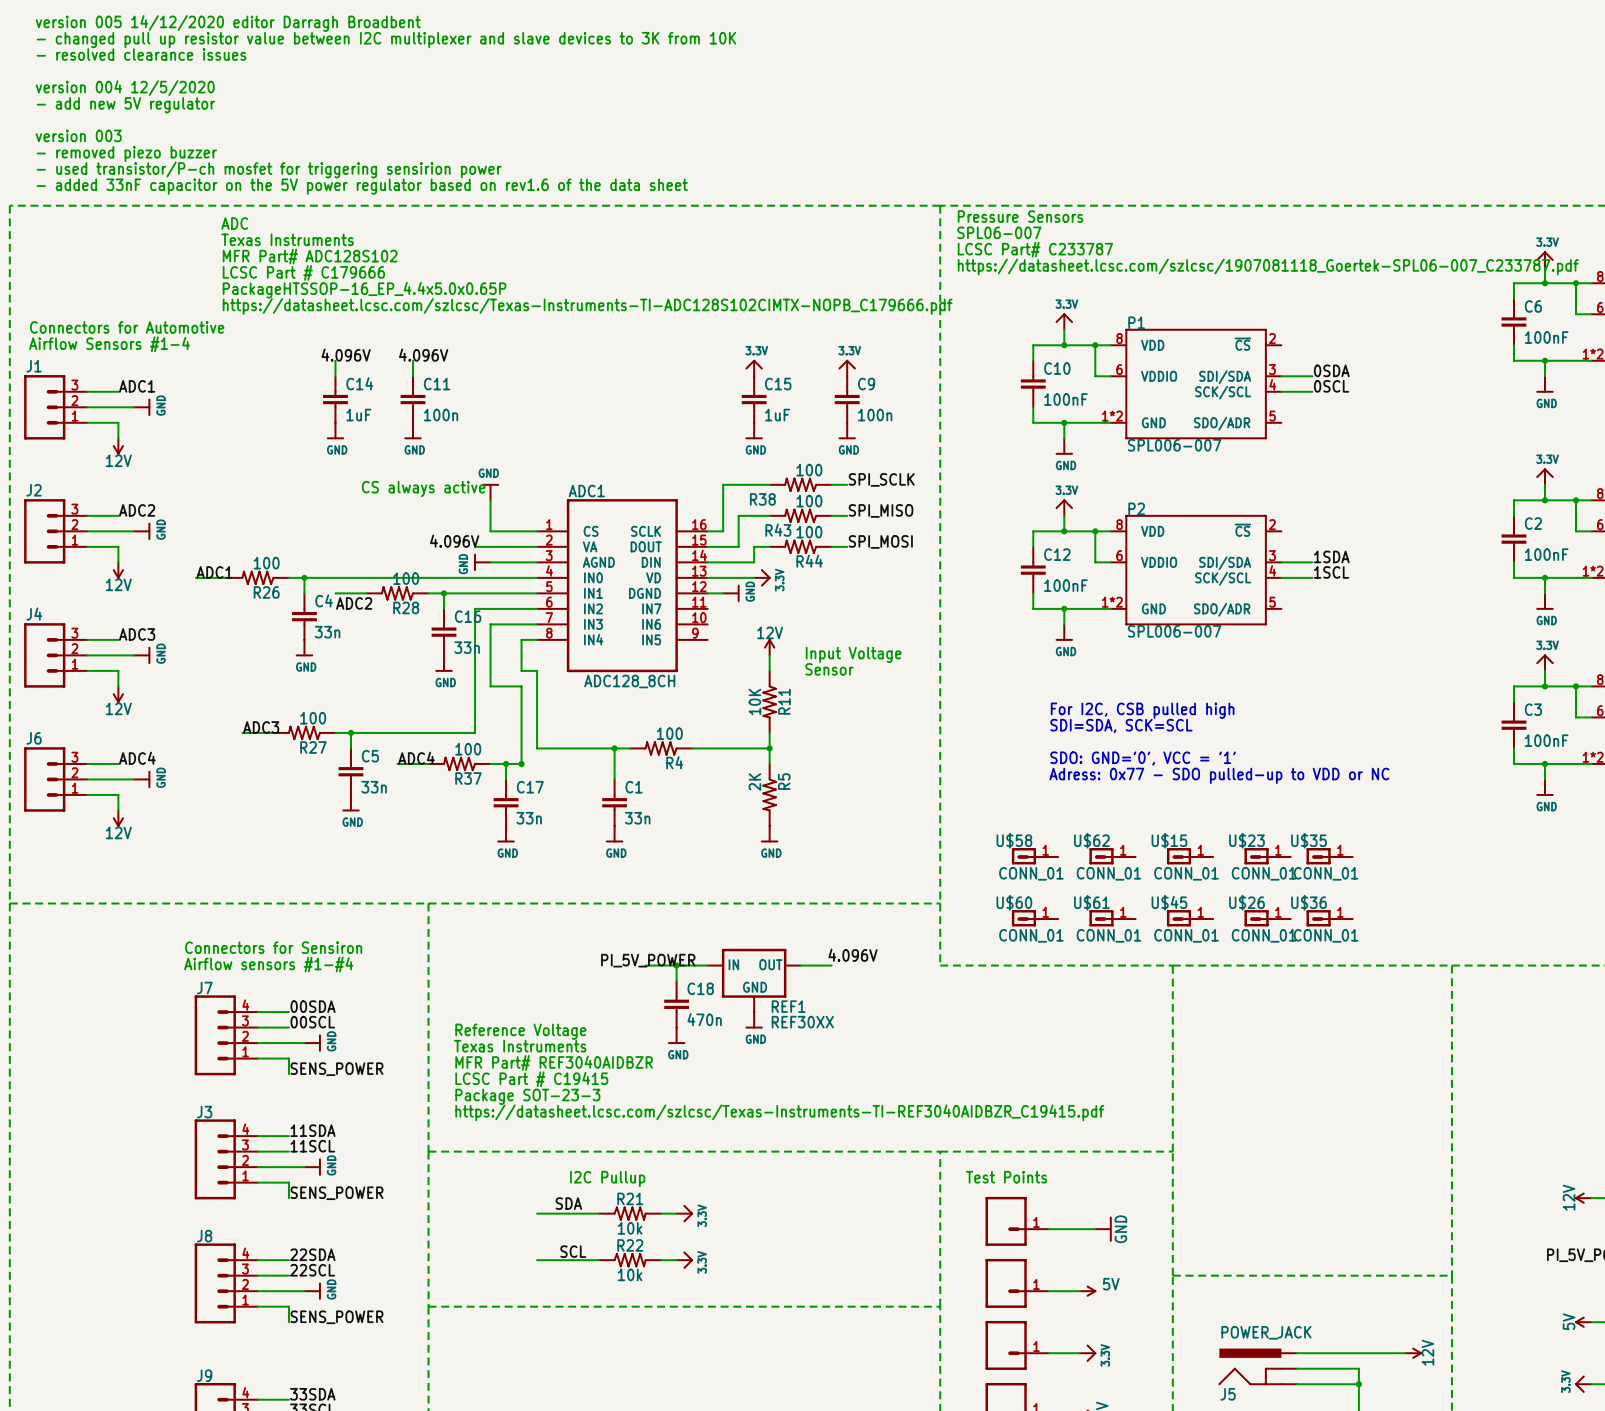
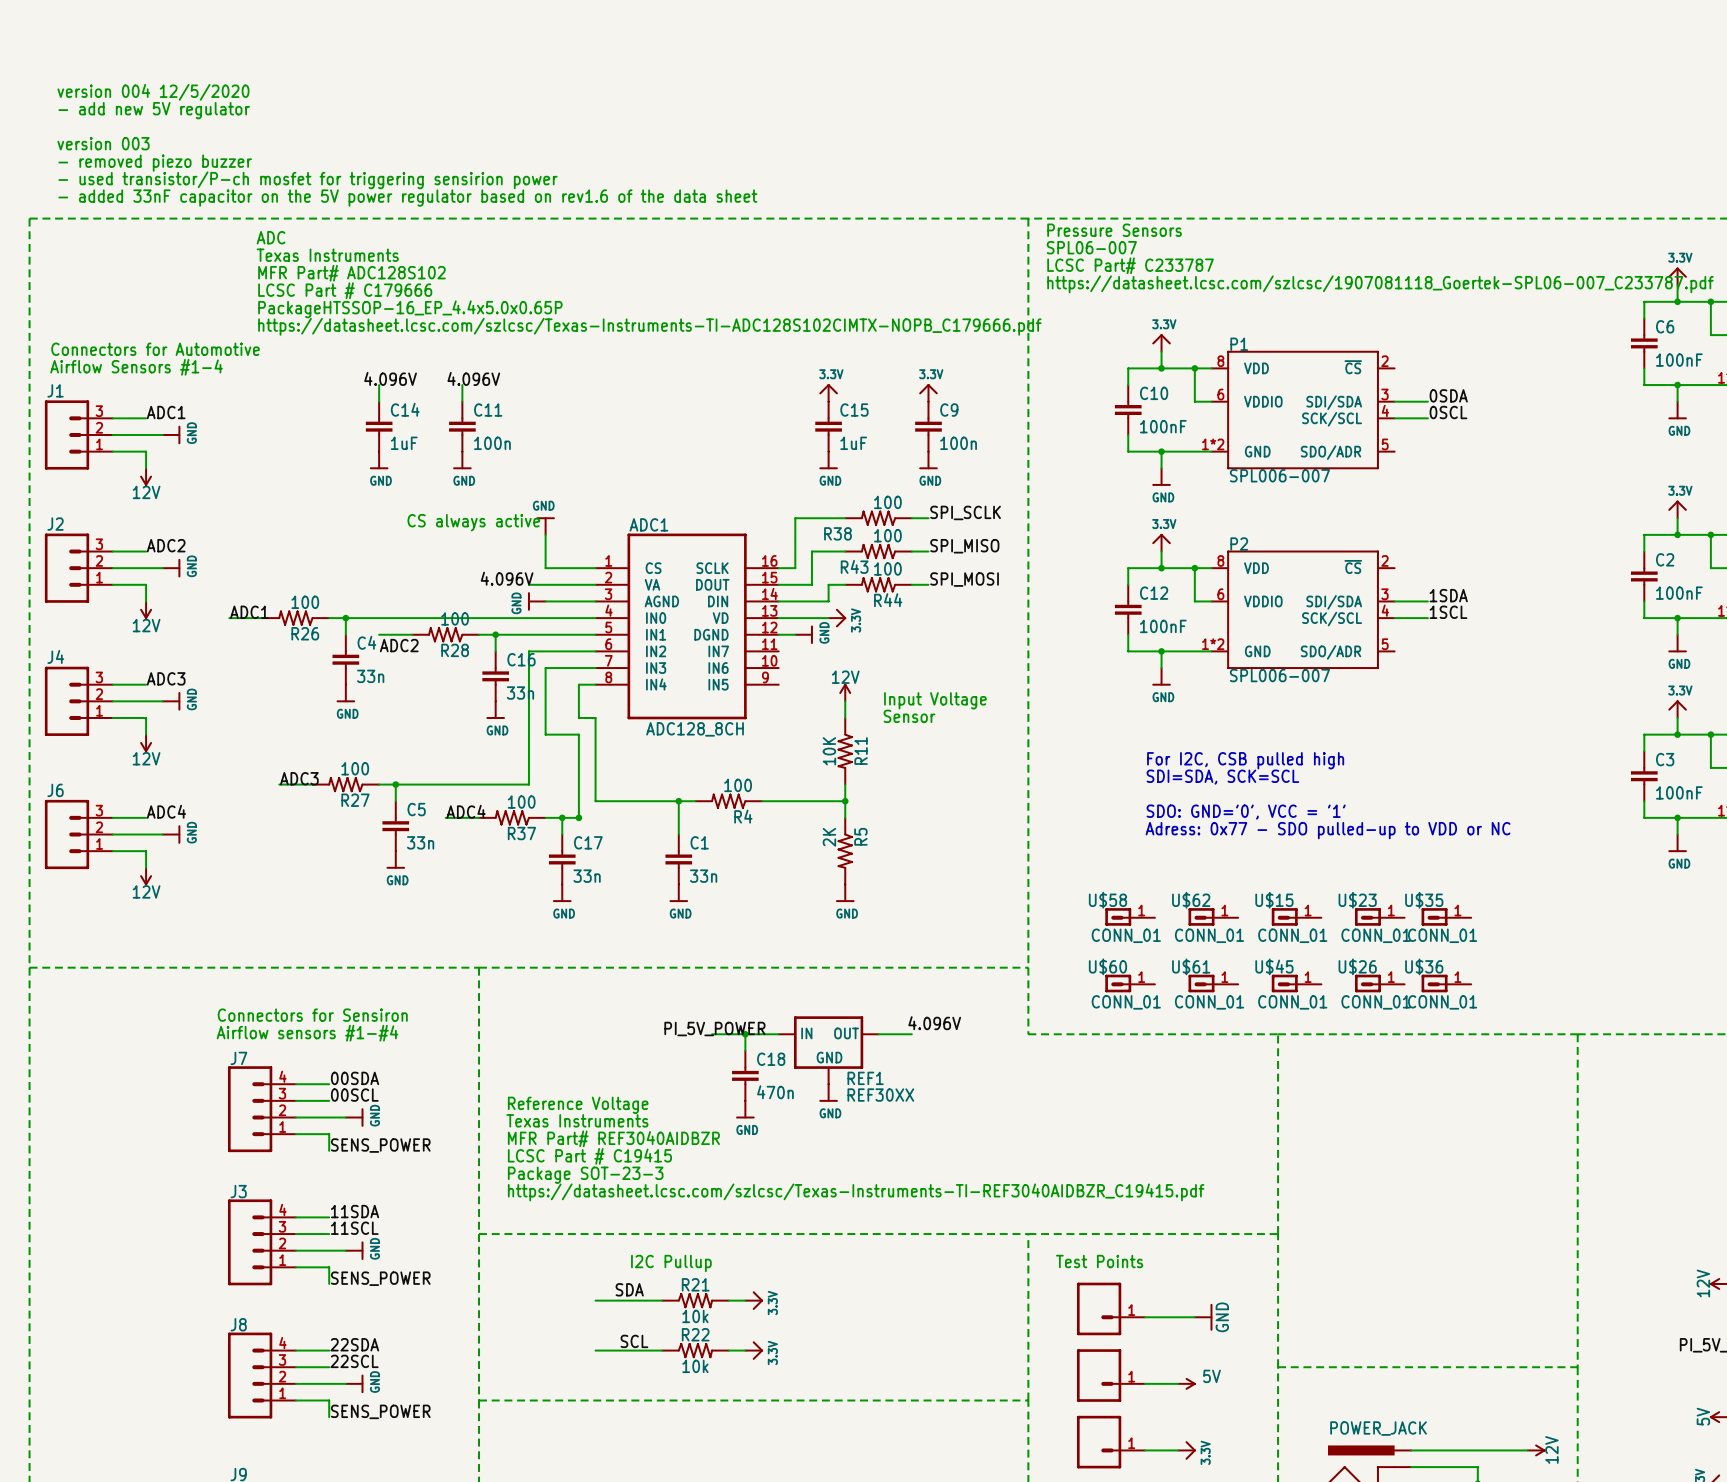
text: version 005 14/12/2020 editor Darragh Broadbent (228, 23) -> none
text: - changed pull up resistor value between I2C multiplexer and slave devices to 3K from 10K (386, 40) -> none
text: - resolved clearance issues (141, 54) -> none

